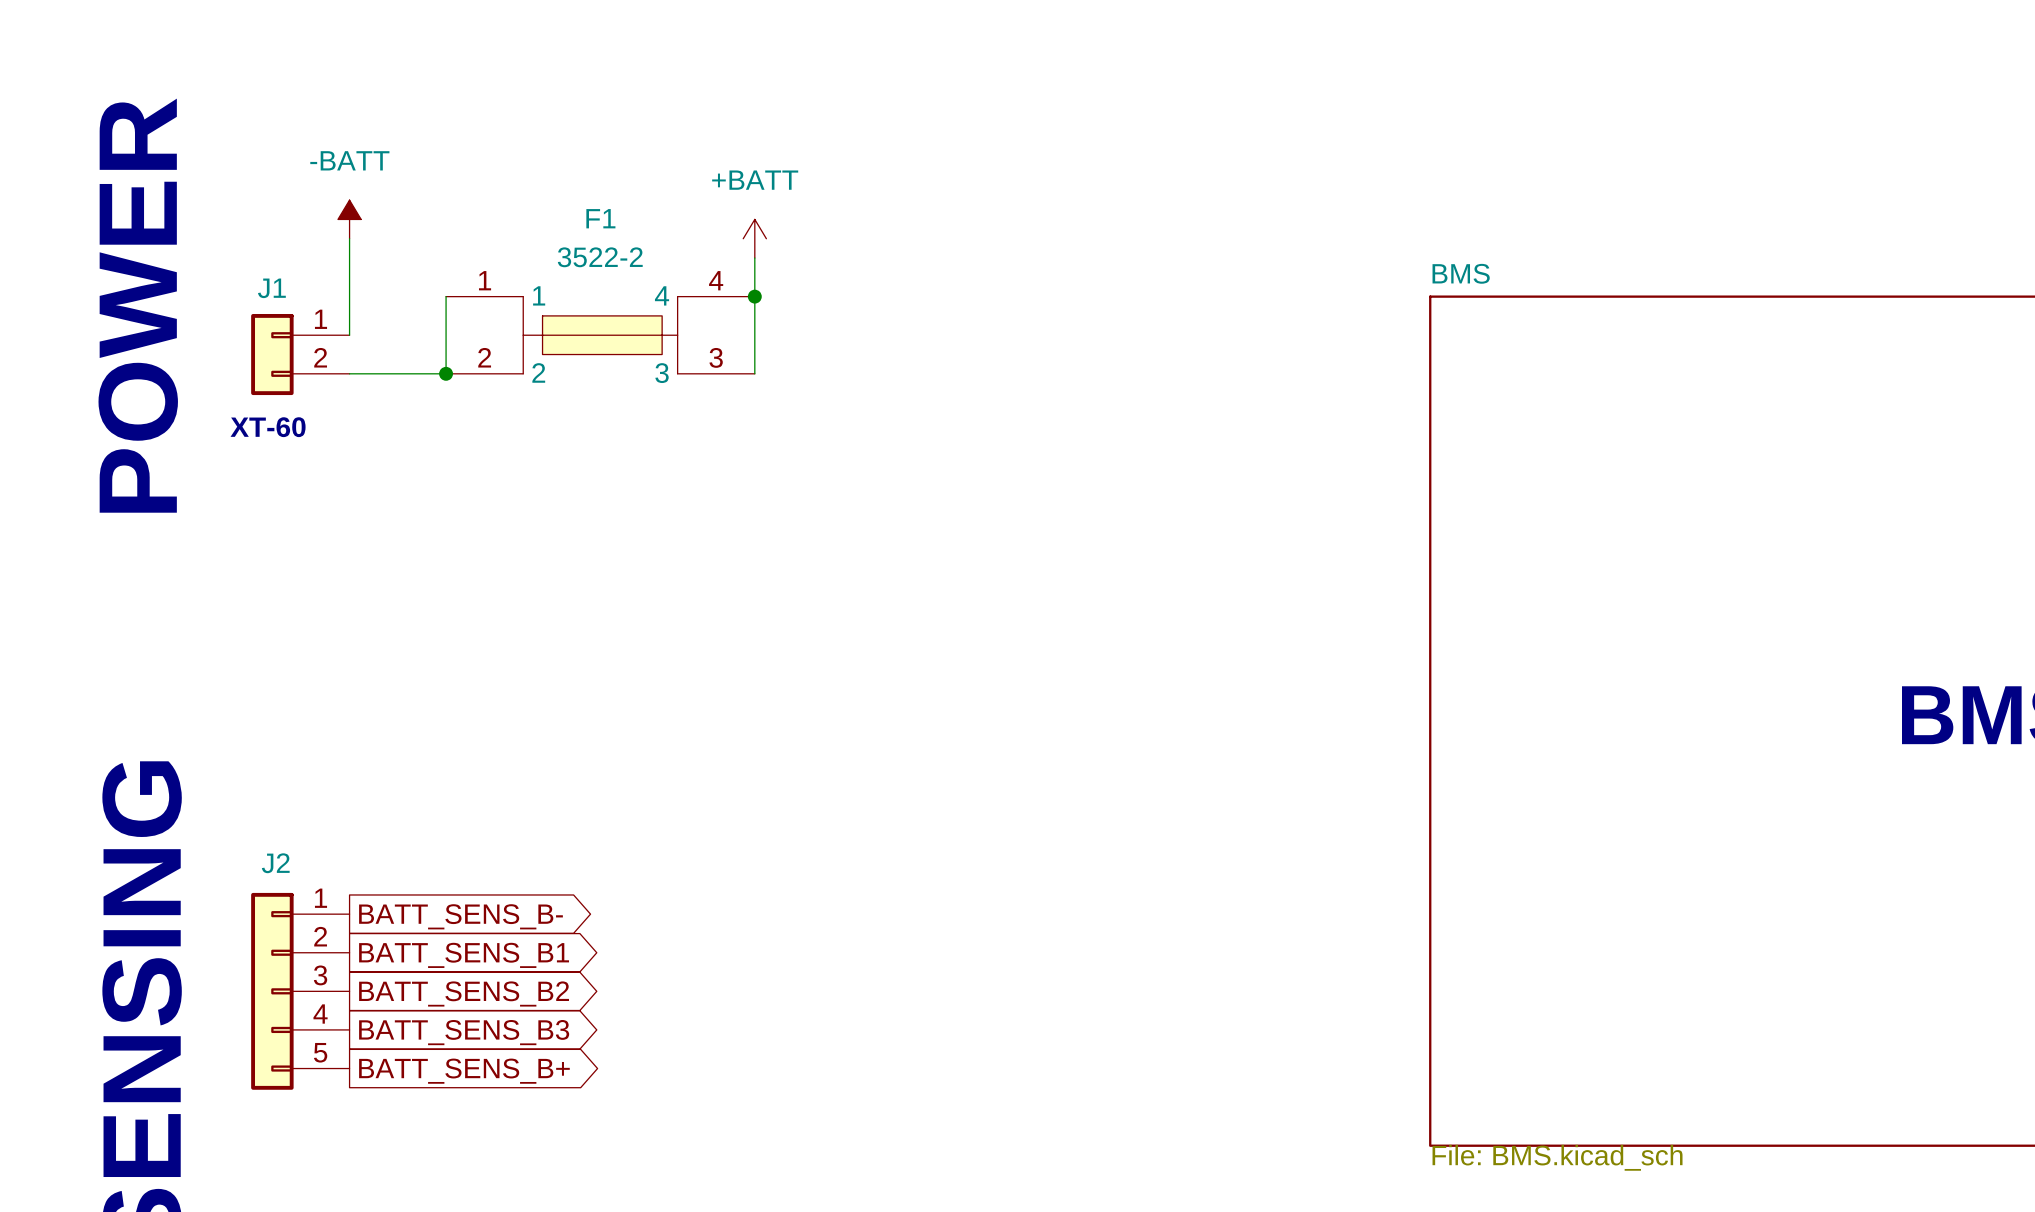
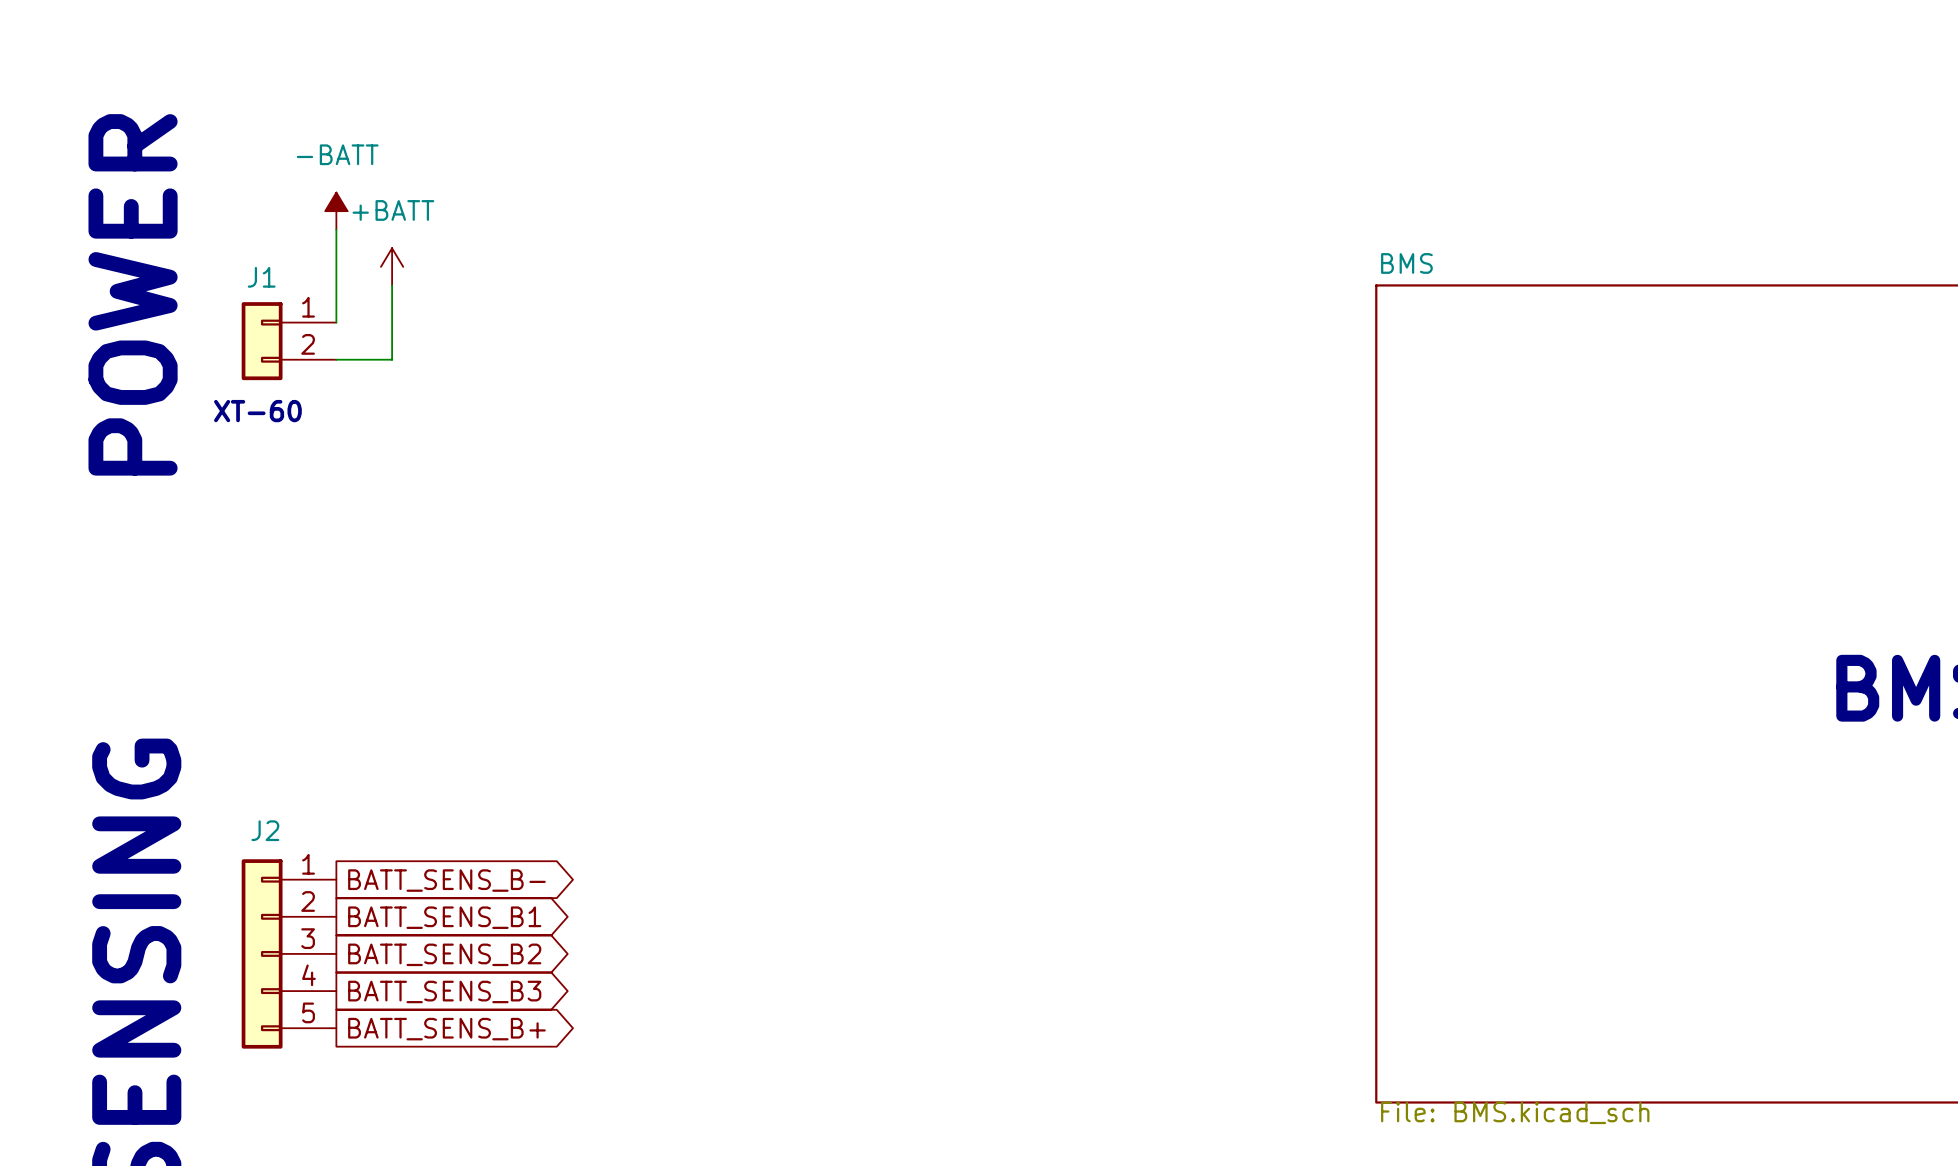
power symbol position: +BATT (754, 238) -> +BATT (392, 266)
wire: (754, 258) (754, 373) -> none
wire: (446, 296) (446, 373) (407, 373) -> (392, 285) (392, 359)
junction: (754, 296) -> none
F1: 3522-2 (600, 335) -> none
junction: (446, 373) -> none

